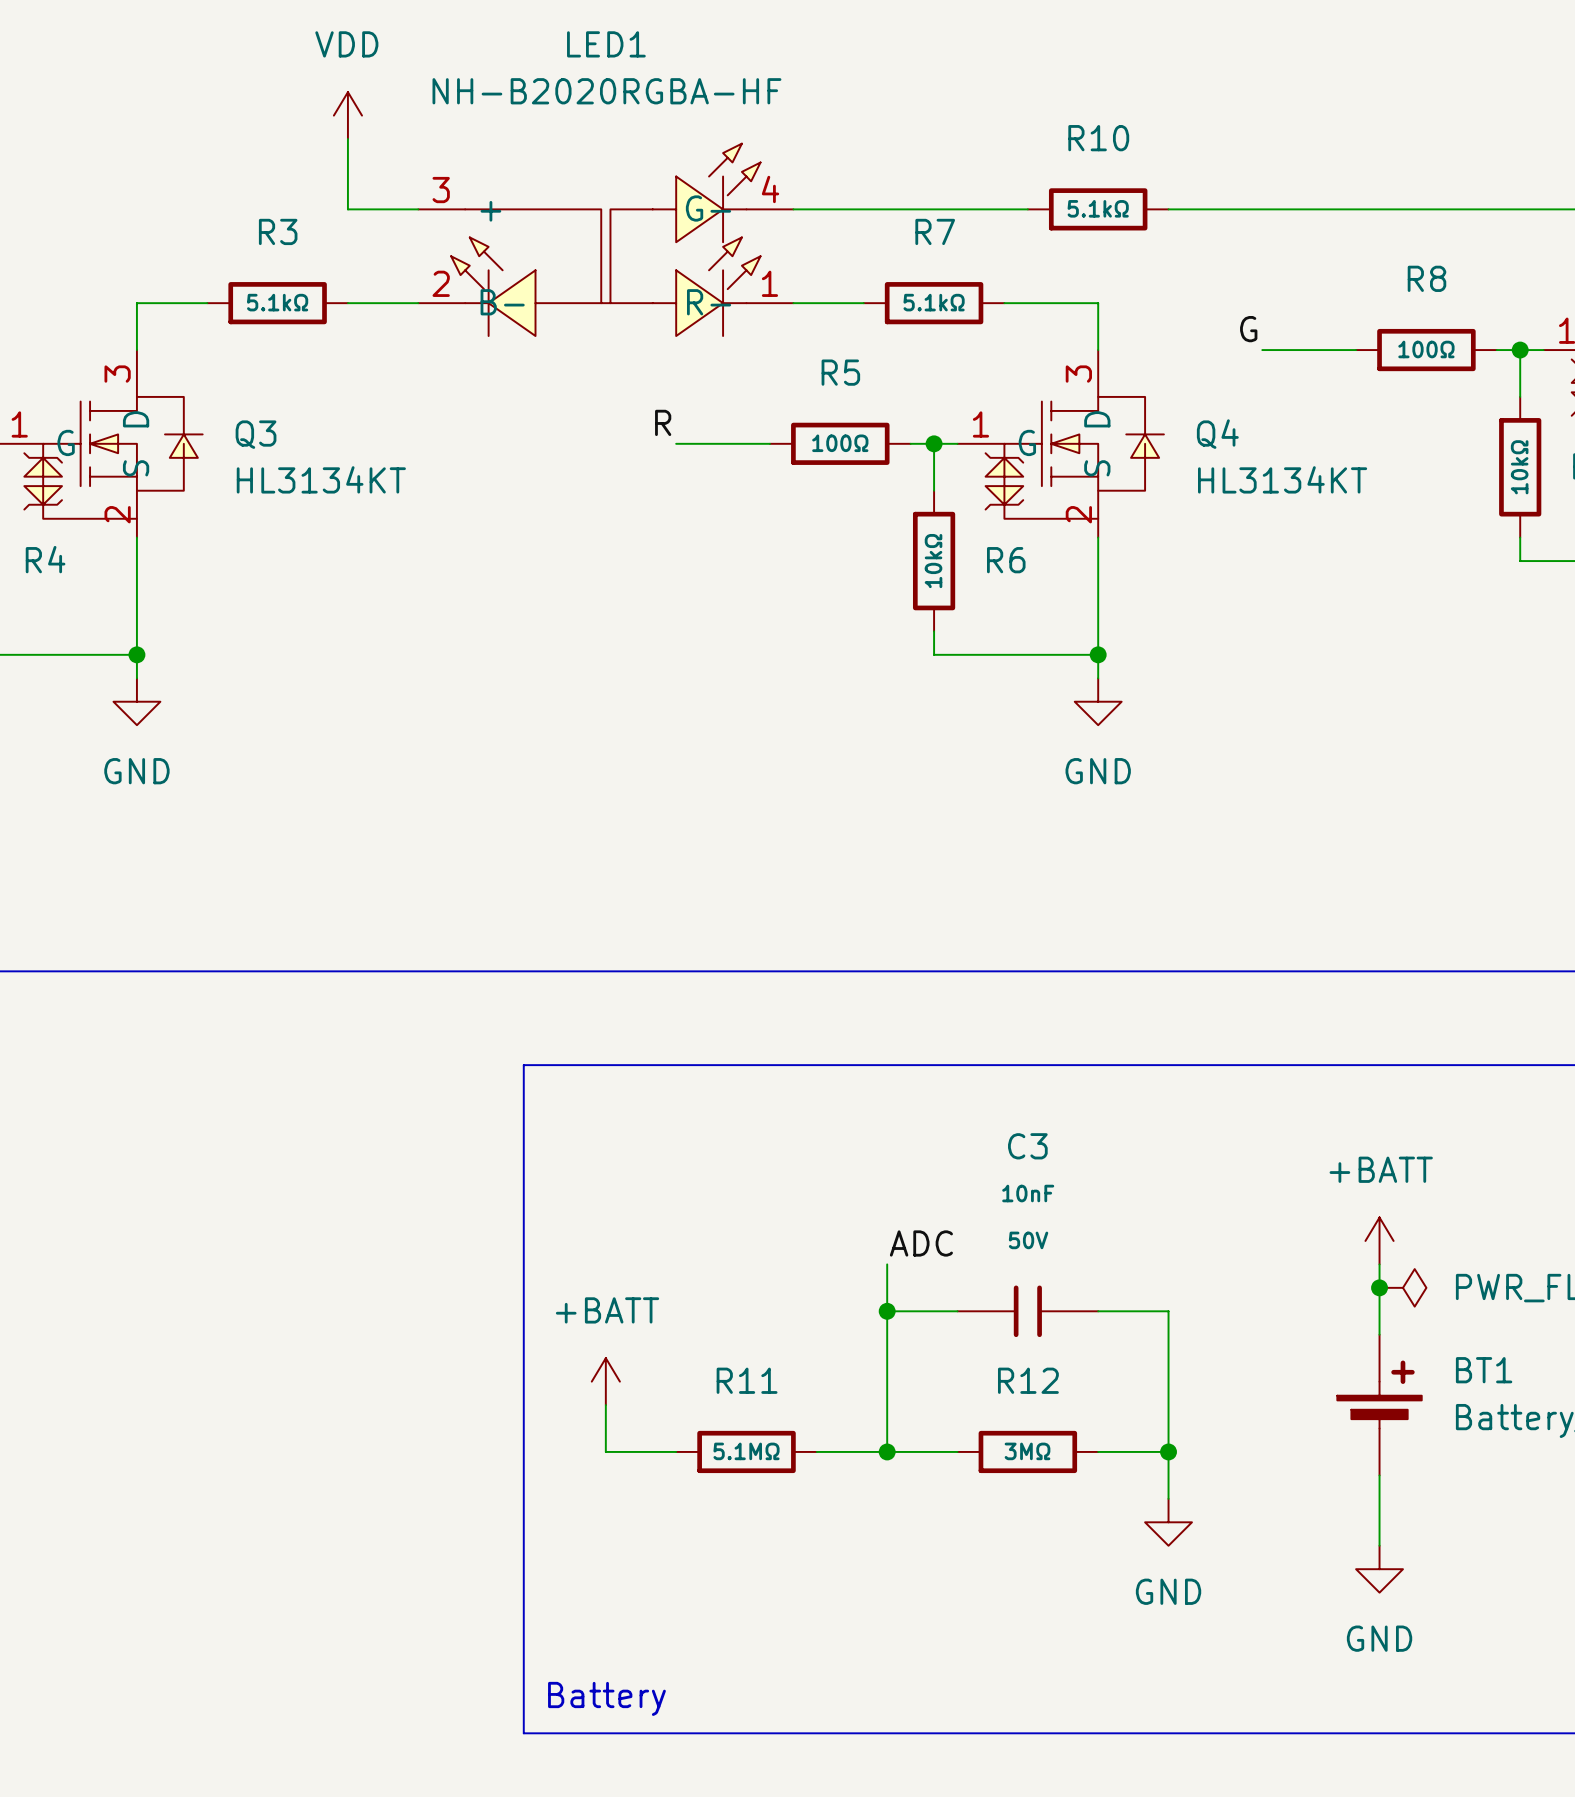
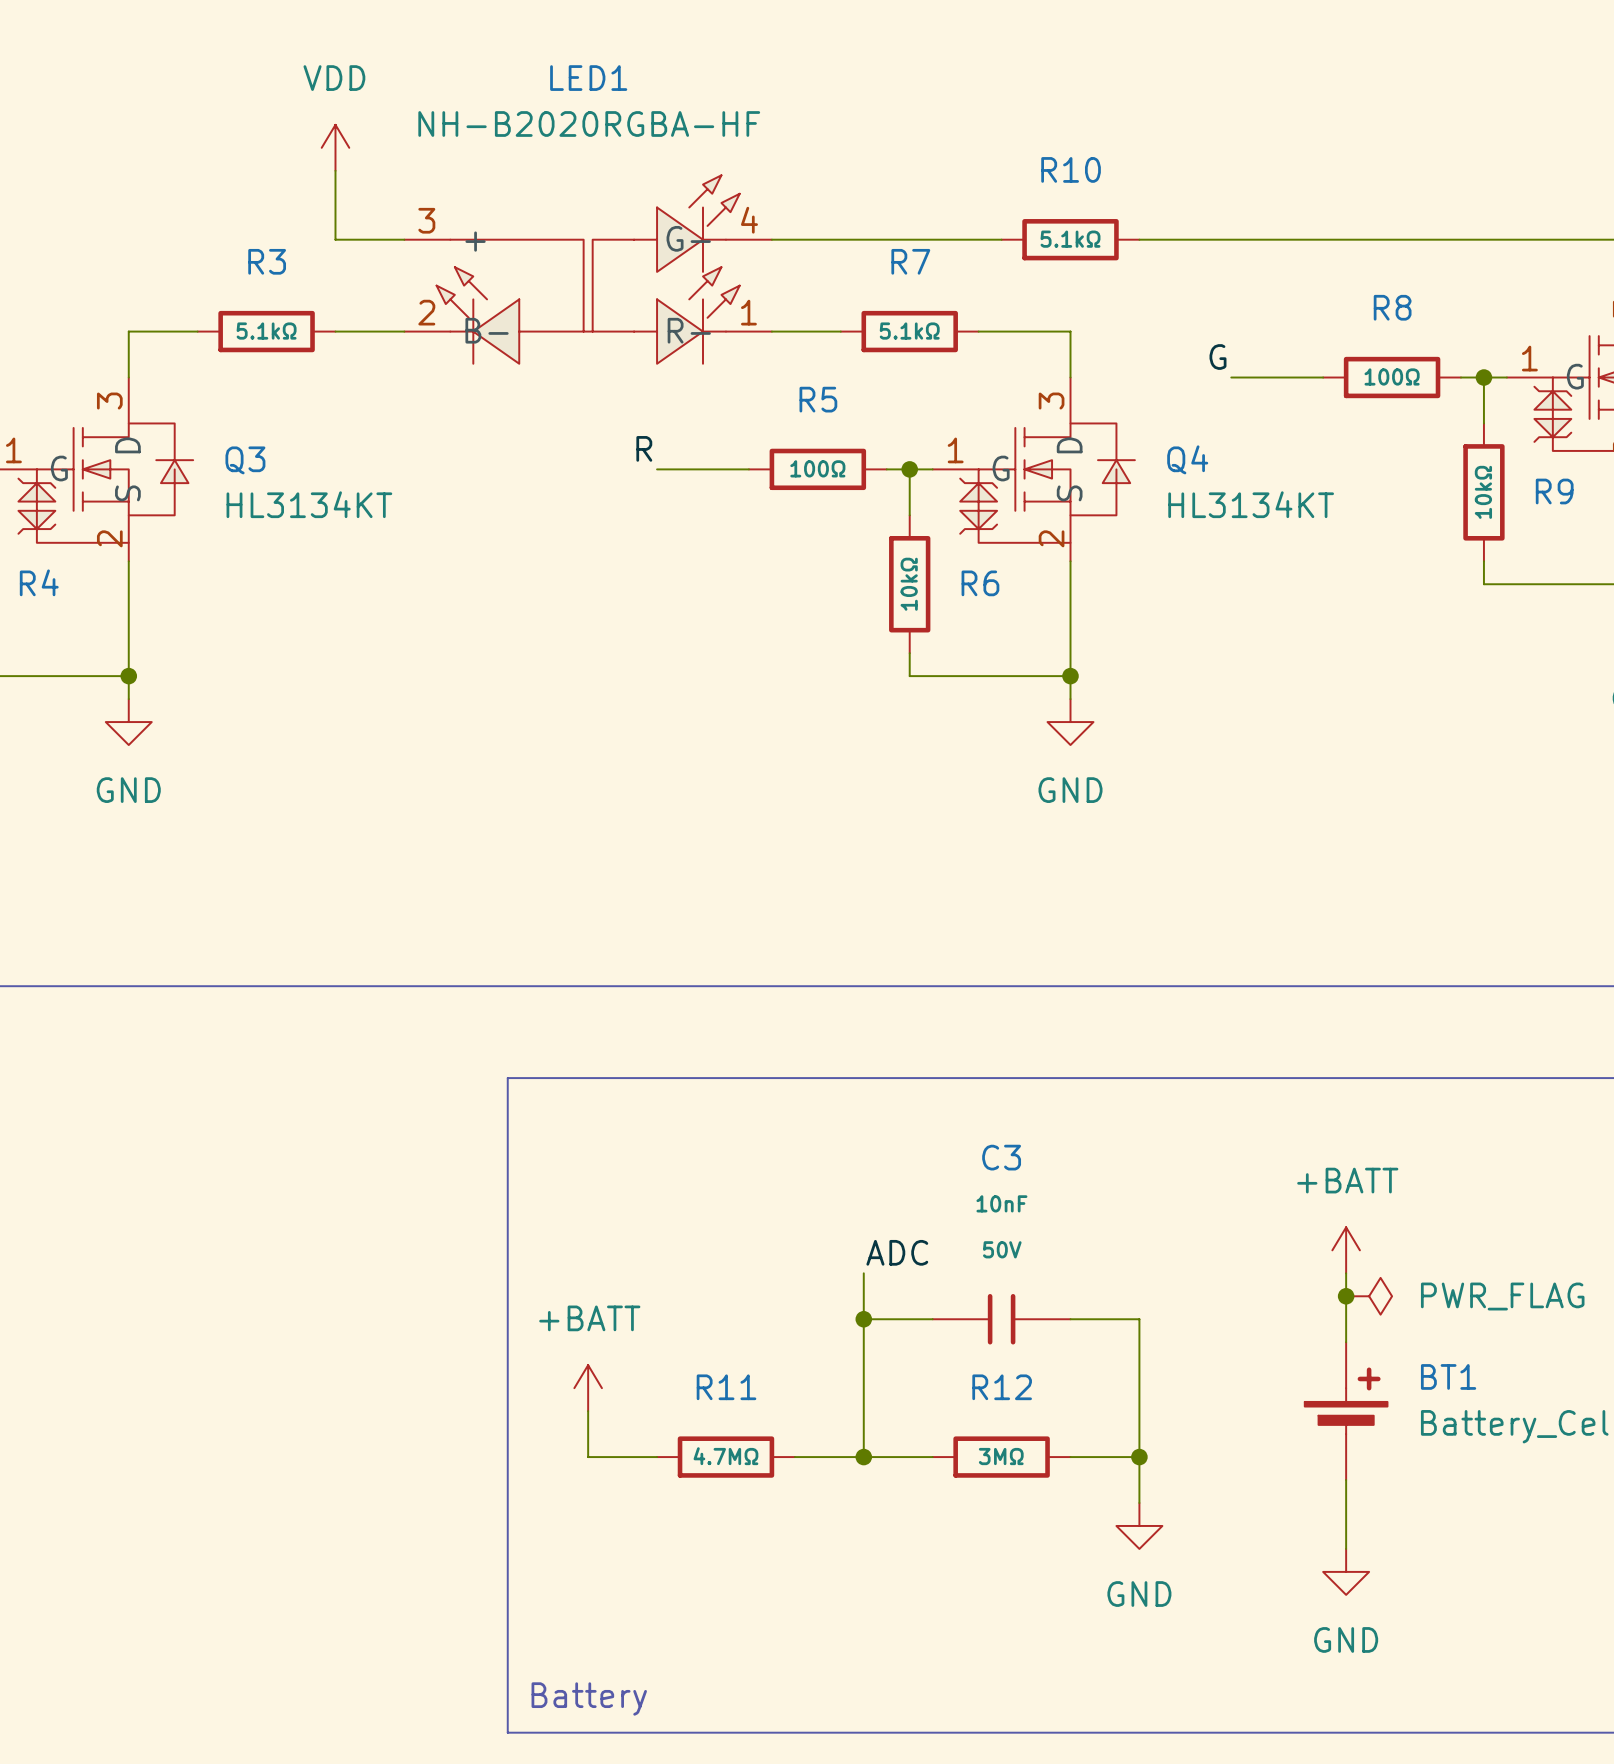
R11 value: 5.1MΩ (746, 1451) -> 4.7MΩ (725, 1456)

